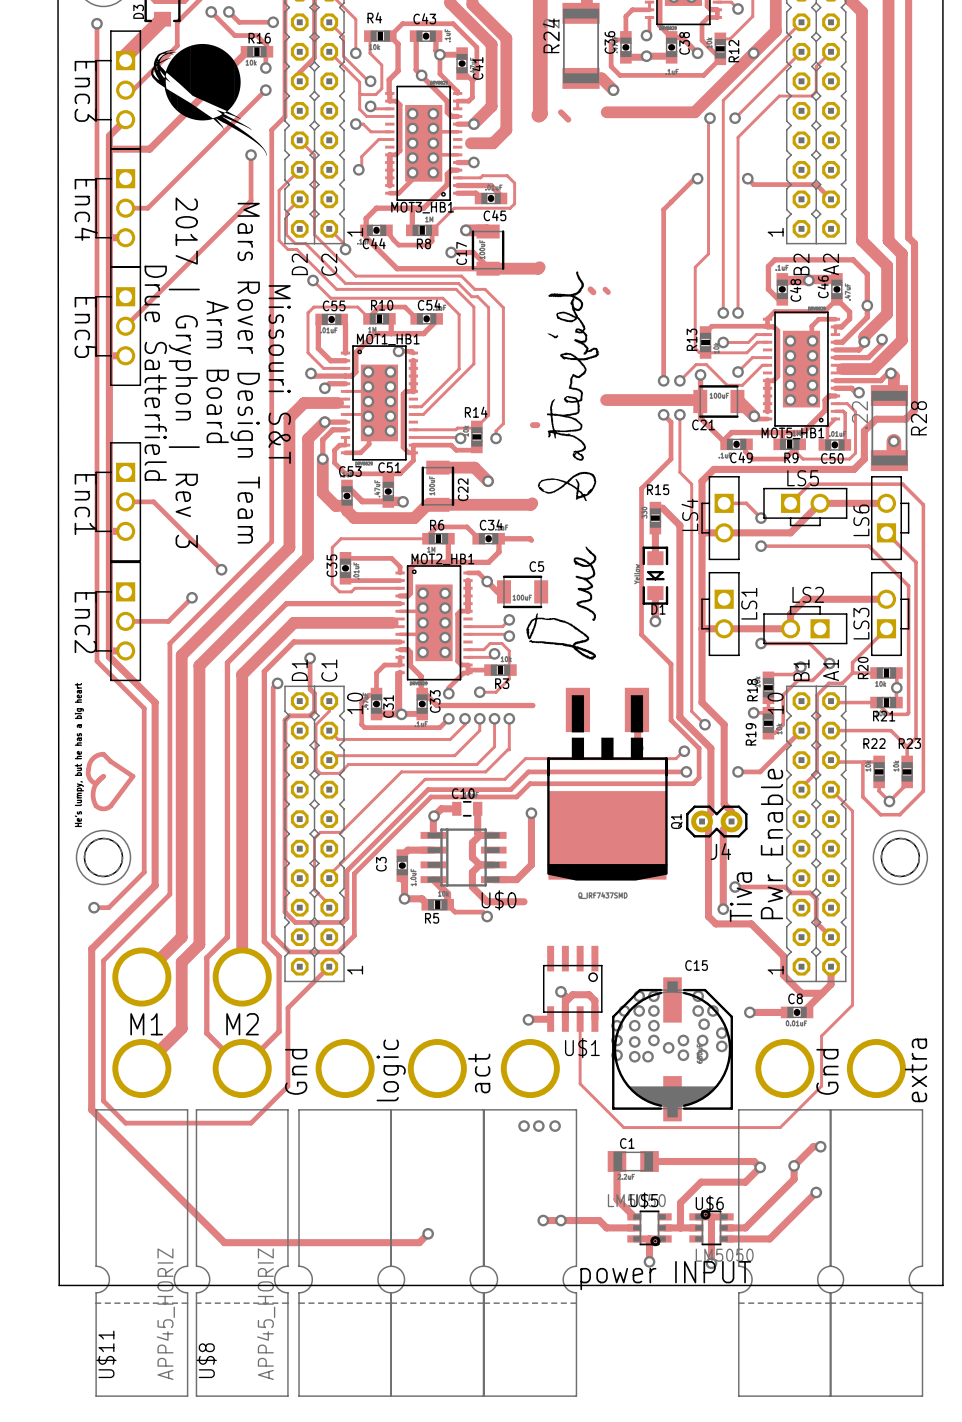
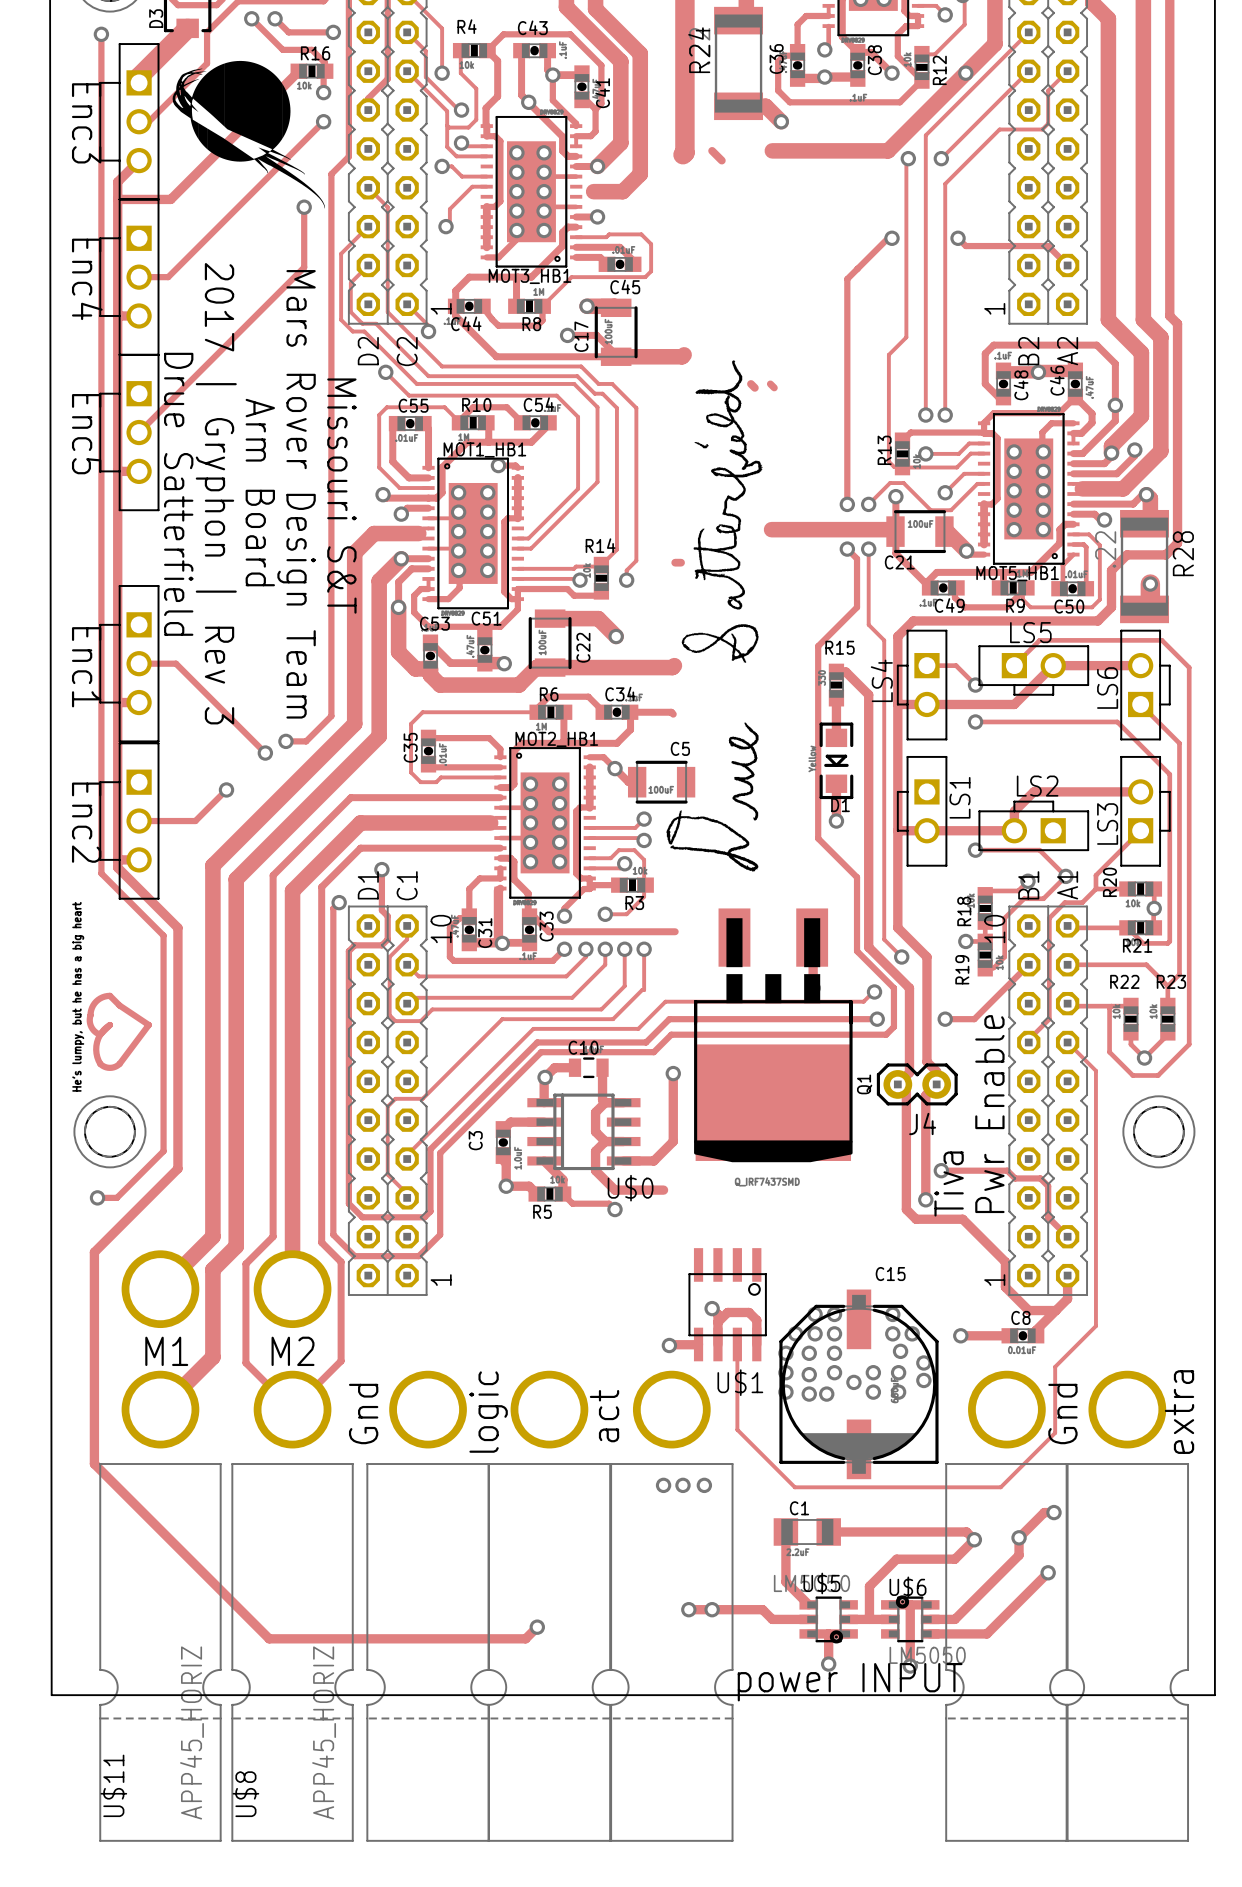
via: none -> (285, 741)
track: (252, 560) (169, 643) (169, 894) (103, 960) (103, 1100) (125, 1123) (251, 1123) (287, 1086) (287, 1008) (329, 966) -> (306, 741) (285, 741)

